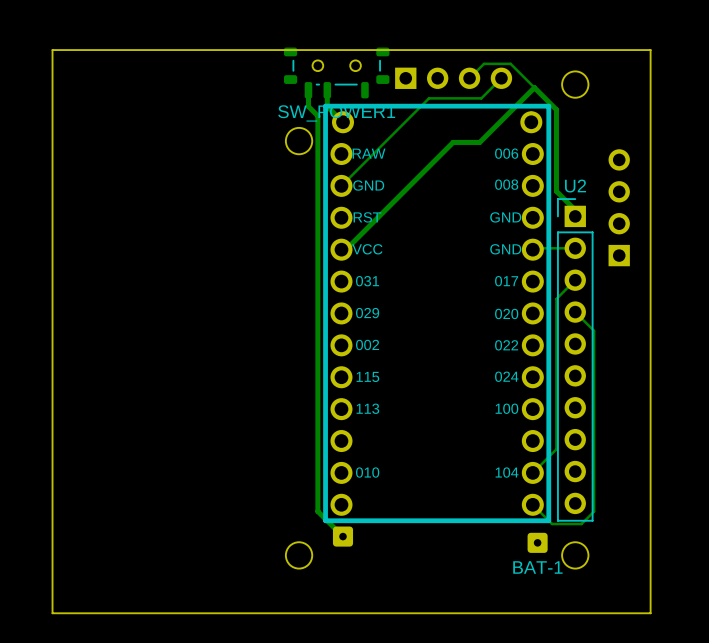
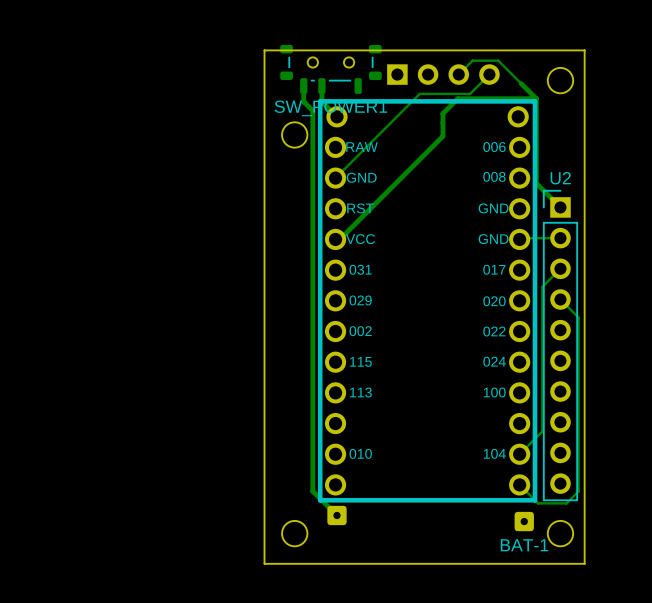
board edge: (650, 50) (52, 50) (52, 613) (650, 613) (650, 50) -> (584, 50) (584, 563) (264, 563) (264, 50) (584, 50)
track: (534, 87) (479, 142) (453, 142) -> none
track: (550, 103) (556, 109) (556, 191) (575, 210) (575, 216) -> (442, 136) (442, 113) (457, 98) (536, 98) (536, 183) (560, 207)
part: (619, 207) -> none

